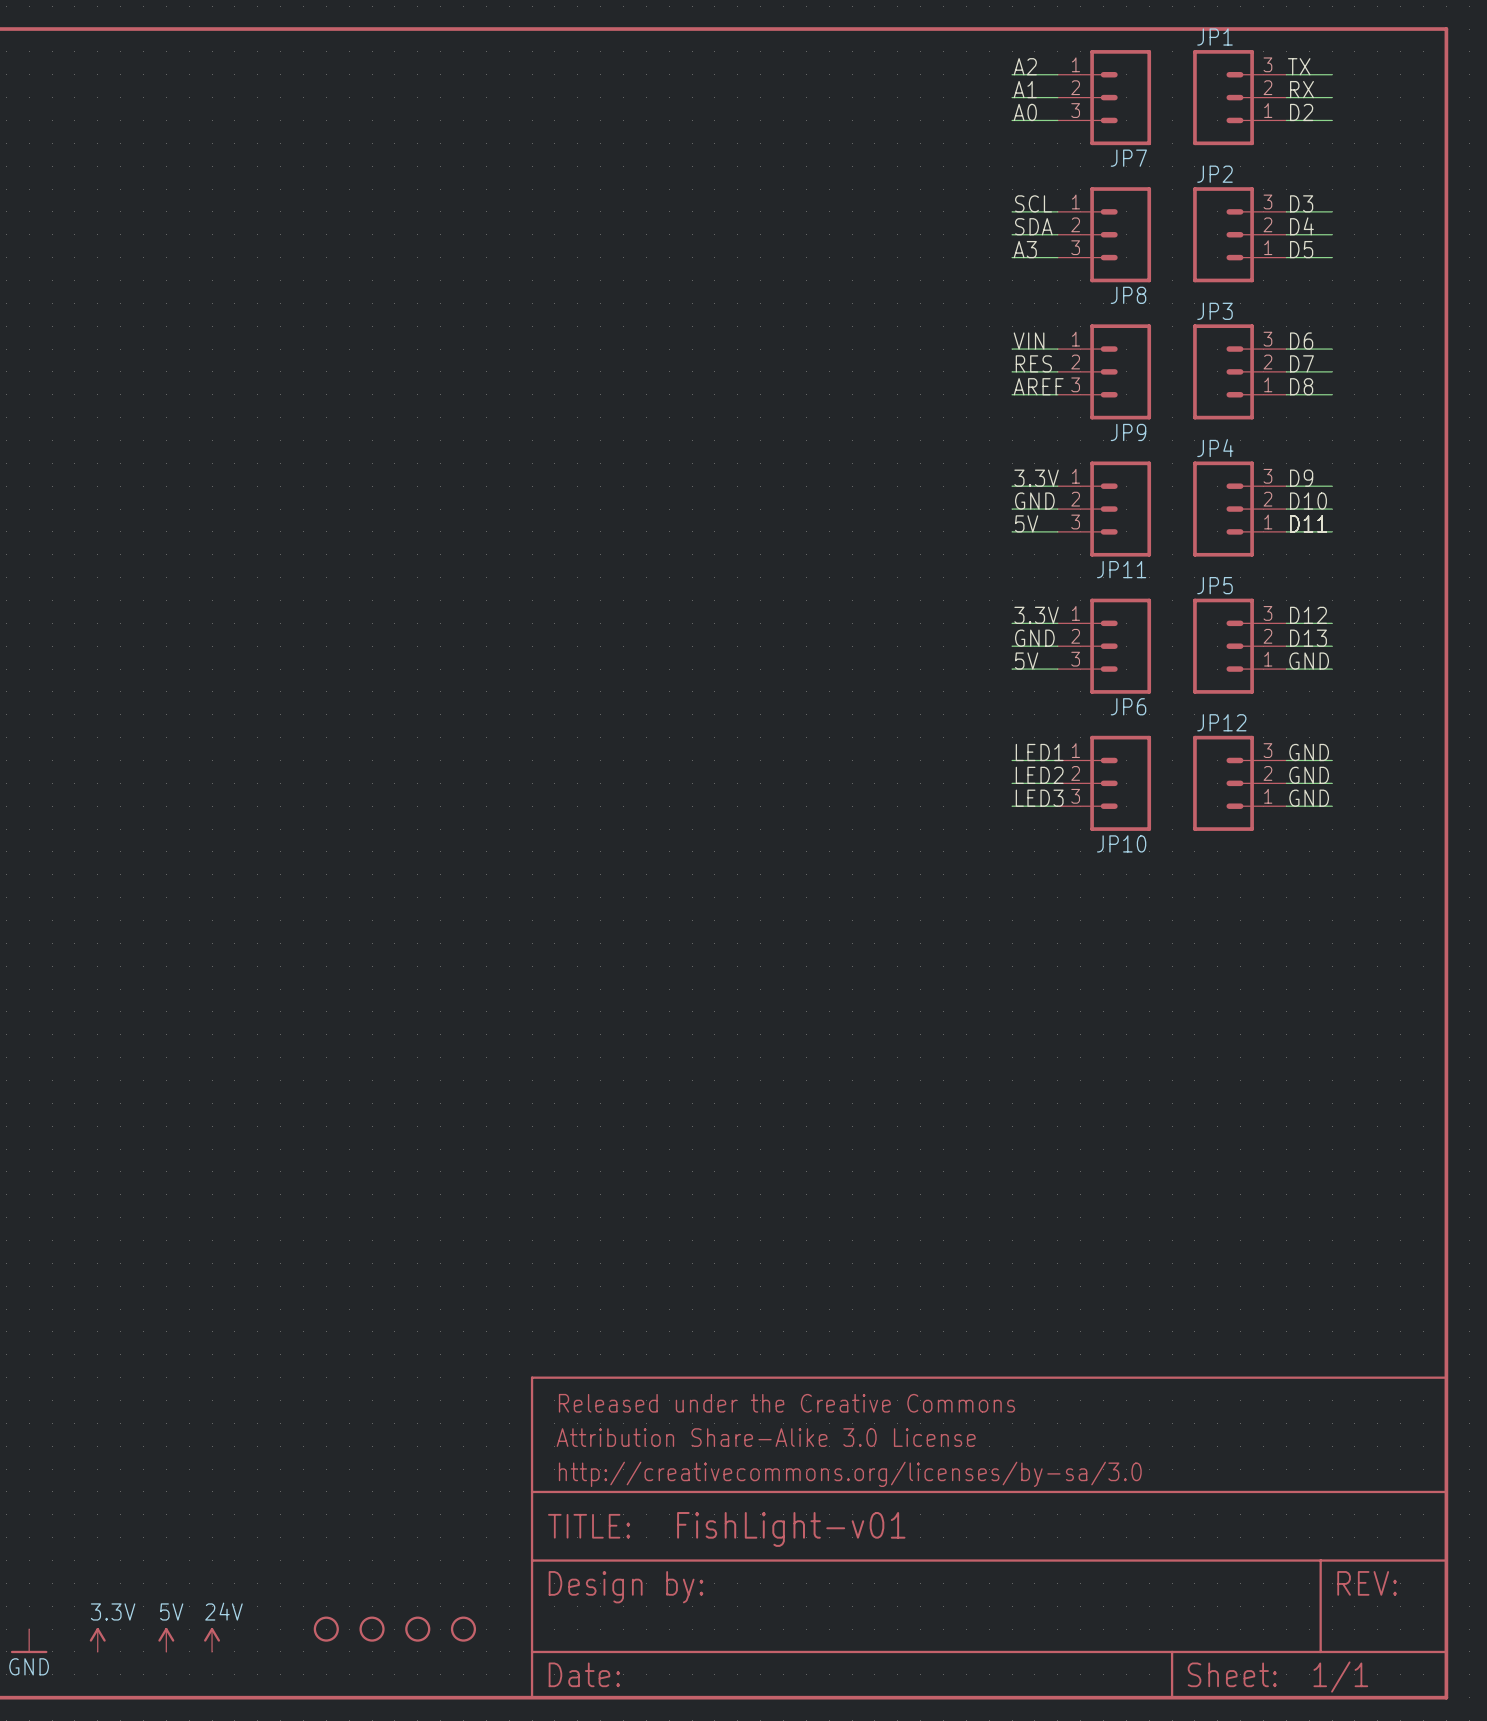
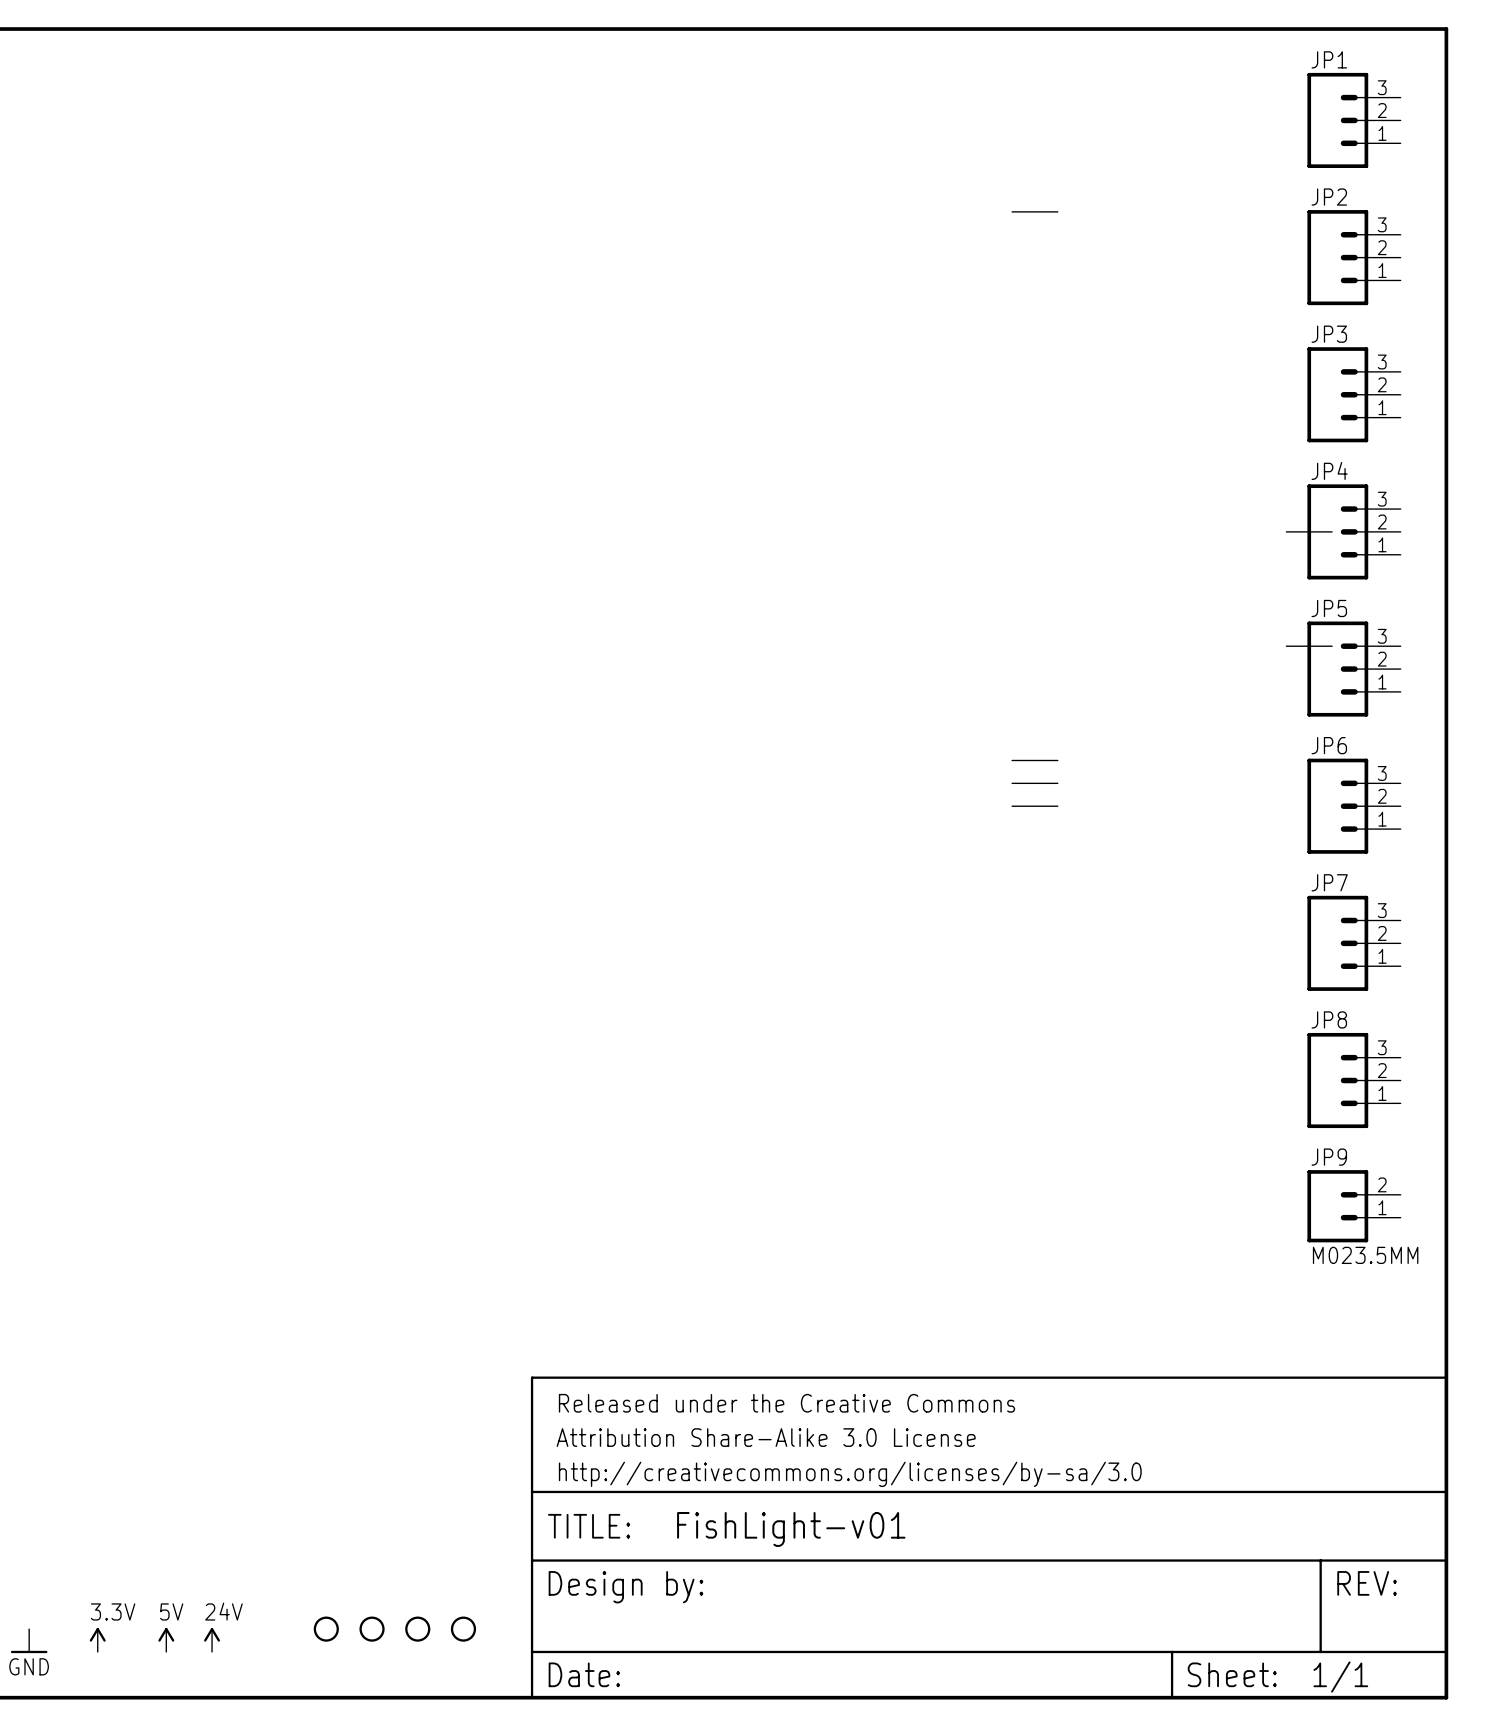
label: A2 (1025, 66) -> none
label: TX (1299, 66) -> none
wire: (1012, 74) (1057, 74) -> none
label: A1 (1025, 89) -> none
label: RX (1301, 89) -> none
wire: (1012, 97) (1057, 97) -> none
JP7 position: (1104, 97) -> (1354, 943)
JP7 rotation: 0° (1120, 97) -> 180° (1337, 943)
JP1 position: (1239, 97) -> (1354, 120)
wire: (1286, 97) (1332, 97) -> none
label: A0 (1025, 112) -> none
label: D2 (1301, 112) -> none
wire: (1012, 120) (1057, 120) -> none
wire: (1286, 120) (1332, 120) -> none
label: SCL (1033, 203) -> none
label: D3 (1301, 203) -> none
label: SDA (1033, 226) -> none
label: D4 (1301, 226) -> none
wire: (1012, 234) (1057, 234) -> none
JP8 position: (1104, 234) -> (1354, 1080)
JP8 rotation: 0° (1120, 234) -> 180° (1337, 1080)
JP2 position: (1239, 234) -> (1354, 257)
wire: (1286, 234) (1332, 234) -> none
label: A3 (1025, 249) -> none
label: D5 (1301, 249) -> none
wire: (1012, 257) (1057, 257) -> none
wire: (1286, 257) (1332, 257) -> none
JP9 symbol: [1057, 324, 1152, 420] -> [1307, 1170, 1401, 1243]
label: VIN (1029, 341) -> none
label: D6 (1301, 341) -> none
wire: (1012, 349) (1057, 349) -> none
label: RES (1033, 363) -> none
label: D7 (1301, 363) -> none
wire: (1012, 371) (1057, 371) -> none
JP3 position: (1239, 371) -> (1354, 394)
wire: (1286, 371) (1332, 371) -> none
label: AREF (1038, 386) -> none
label: D8 (1301, 386) -> none
wire: (1012, 394) (1057, 394) -> none
wire: (1286, 394) (1332, 394) -> none
JP9 name position: JP9 (1128, 432) -> JP9 (1329, 1157)
label: 3.3V (1036, 478) -> none
label: D9 (1301, 478) -> none
wire: (1012, 486) (1057, 486) -> none
label: GND (1034, 501) -> none
label: D10 (1308, 501) -> none
wire: (1012, 509) (1057, 509) -> none
JP11: (1104, 509) -> none
JP4 position: (1239, 509) -> (1354, 531)
wire: (1286, 509) (1332, 509) -> none
label: 5V (1026, 523) -> none
label: D11 (1308, 523) -> none
wire: (1012, 531) (1057, 531) -> none
label: 3.3V (1036, 615) -> none
label: D12 (1308, 615) -> none
wire: (1012, 623) (1057, 623) -> none
label: GND (1034, 638) -> none
label: D13 (1308, 638) -> none
wire: (1012, 646) (1057, 646) -> none
JP6 position: (1104, 646) -> (1354, 806)
JP6 rotation: 0° (1120, 646) -> 180° (1337, 806)
JP5 position: (1239, 646) -> (1354, 669)
label: 5V (1026, 661) -> none
label: GND (1309, 661) -> none
wire: (1012, 669) (1057, 669) -> none
wire: (1286, 669) (1332, 669) -> none
label: LED1 (1039, 752) -> none
label: GND (1309, 752) -> none
label: LED2 (1039, 775) -> none
label: GND (1309, 775) -> none
JP10: (1104, 783) -> none
JP12: (1239, 783) -> none
wire: (1286, 783) (1332, 783) -> none
label: LED3 (1039, 798) -> none
label: GND (1309, 798) -> none
wire: (1286, 806) (1332, 806) -> none
JP9 value: none -> M023.5MM (1365, 1255)

